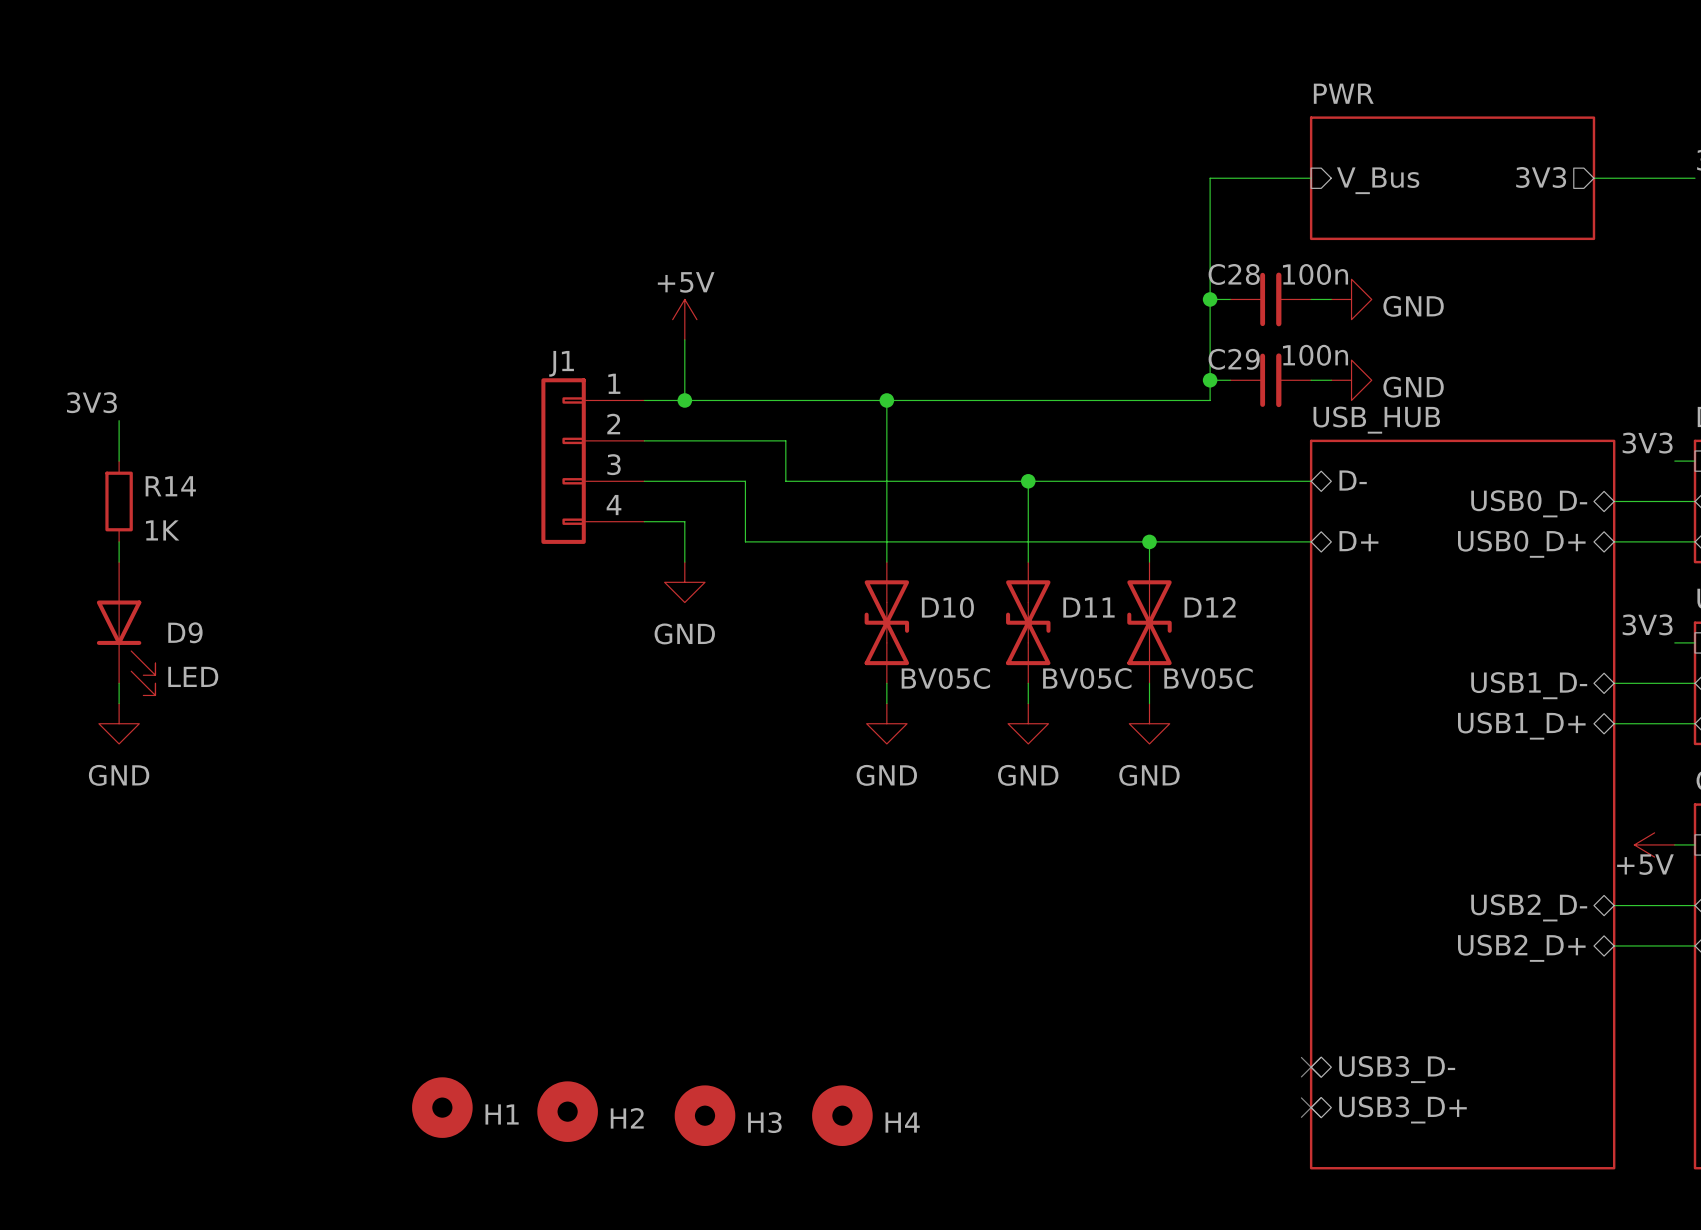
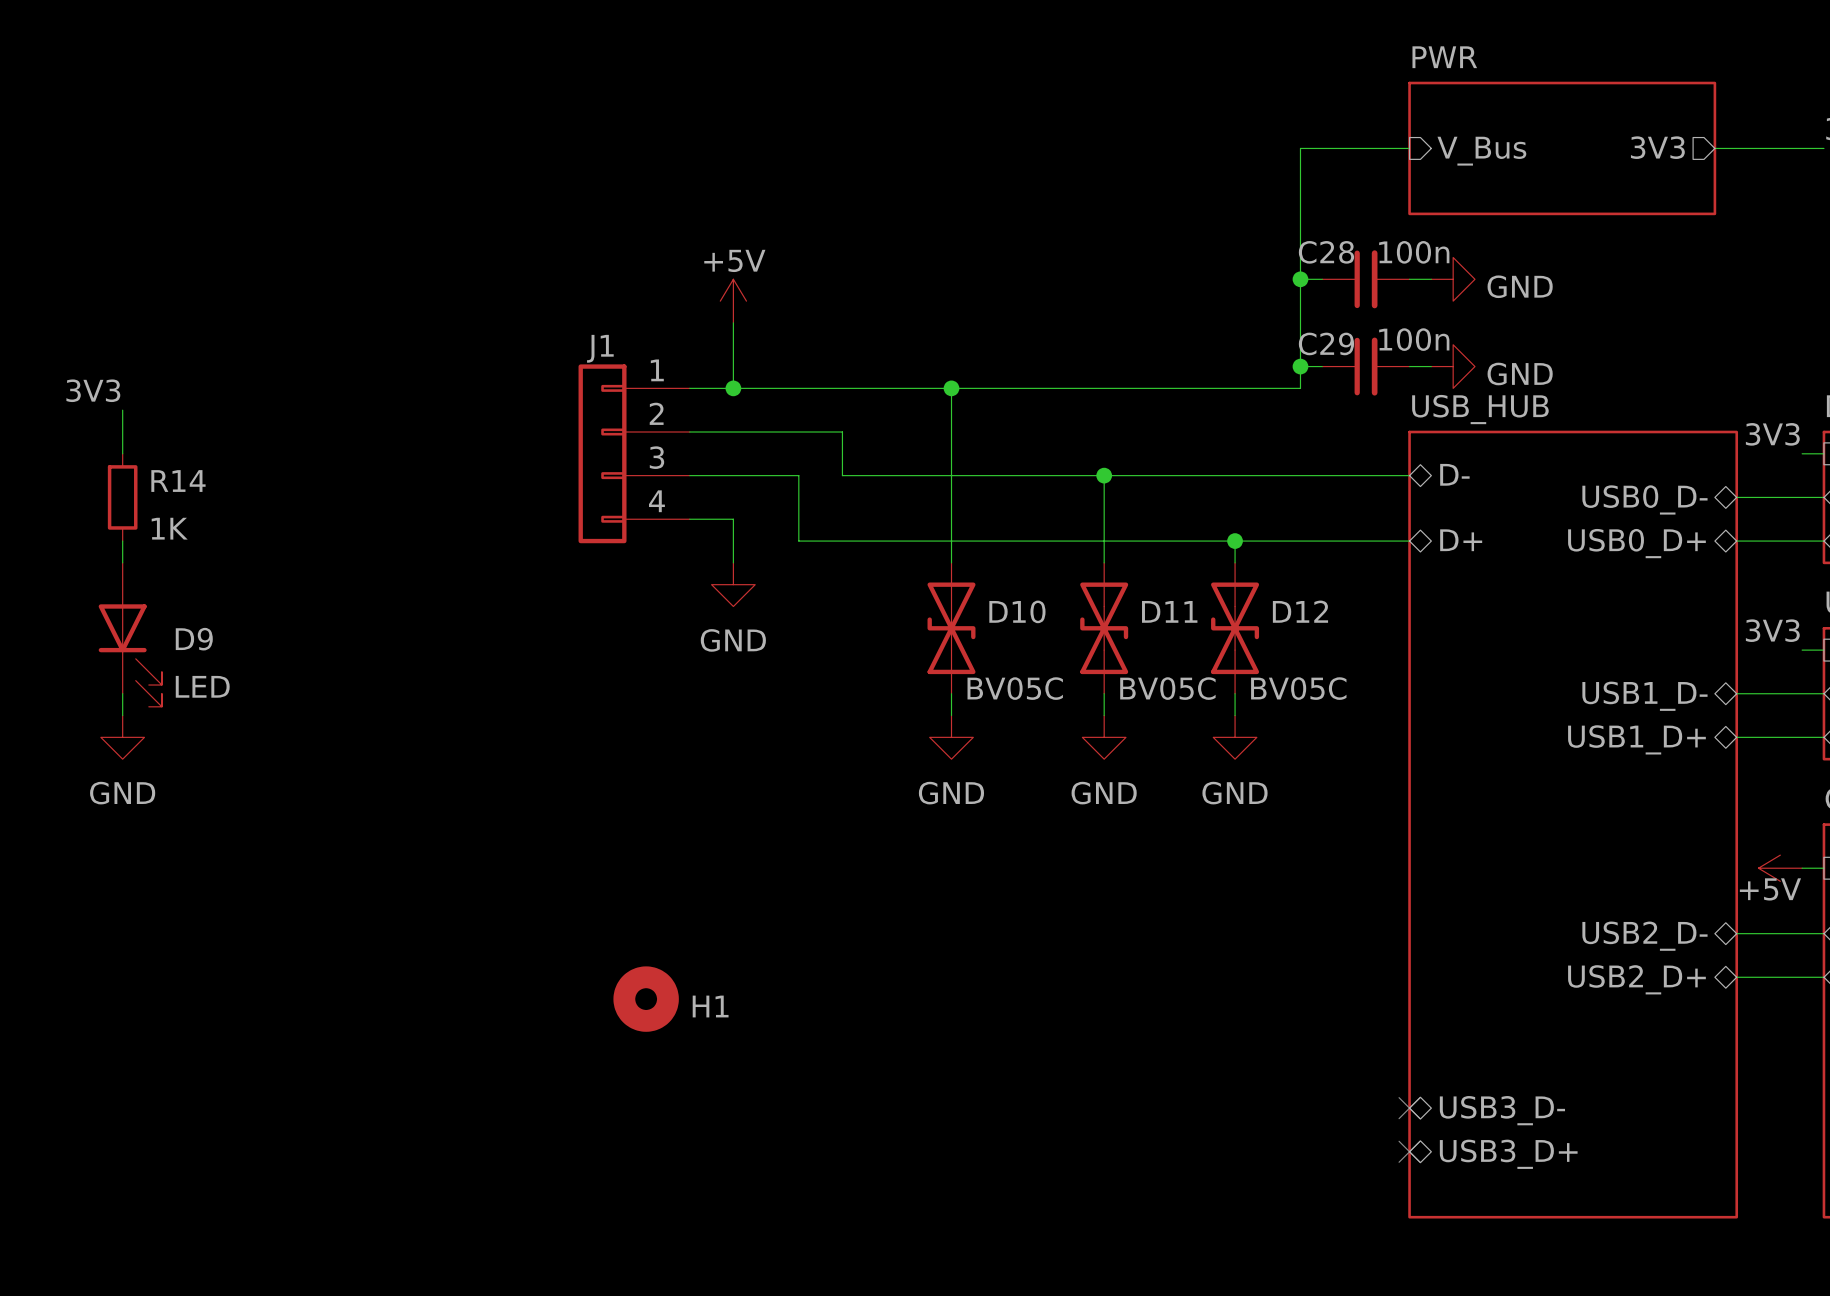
H1 position: (442, 1107) -> (646, 999)
H2: (567, 1111) -> none
H3: (705, 1115) -> none
H4: (842, 1115) -> none

